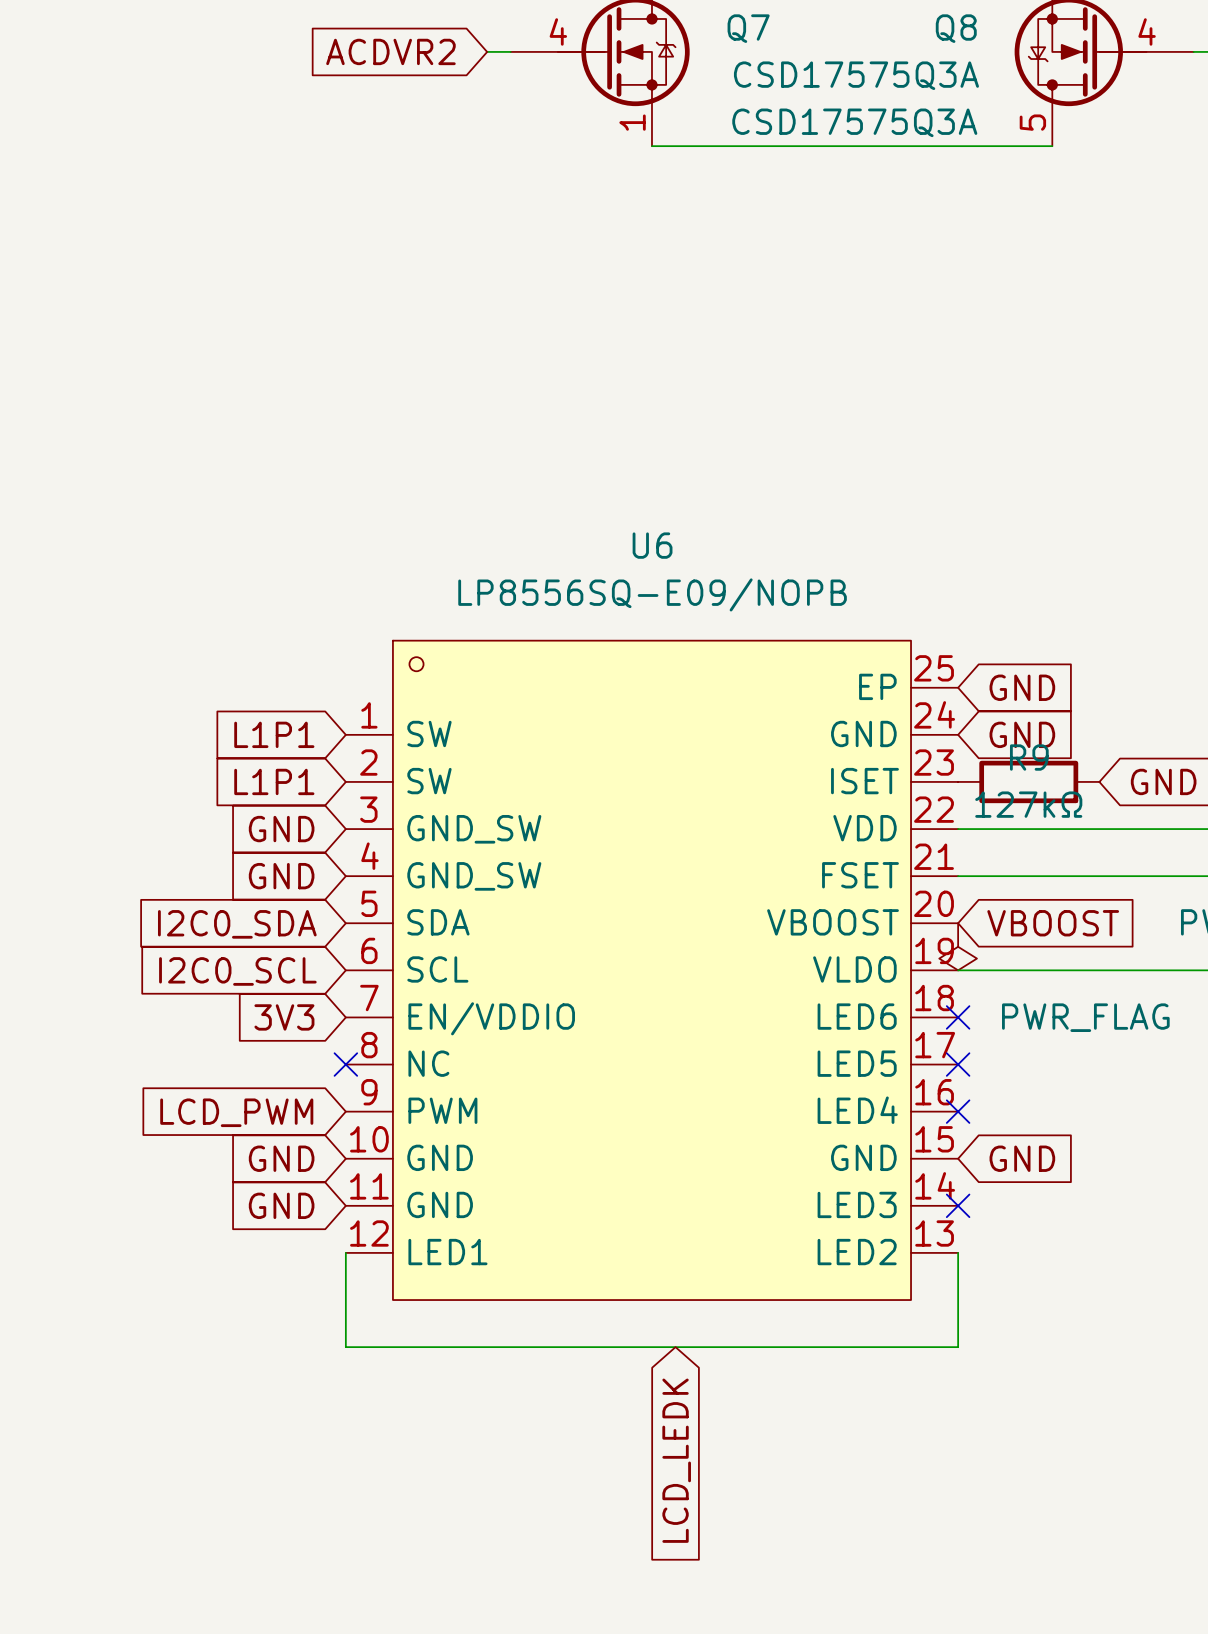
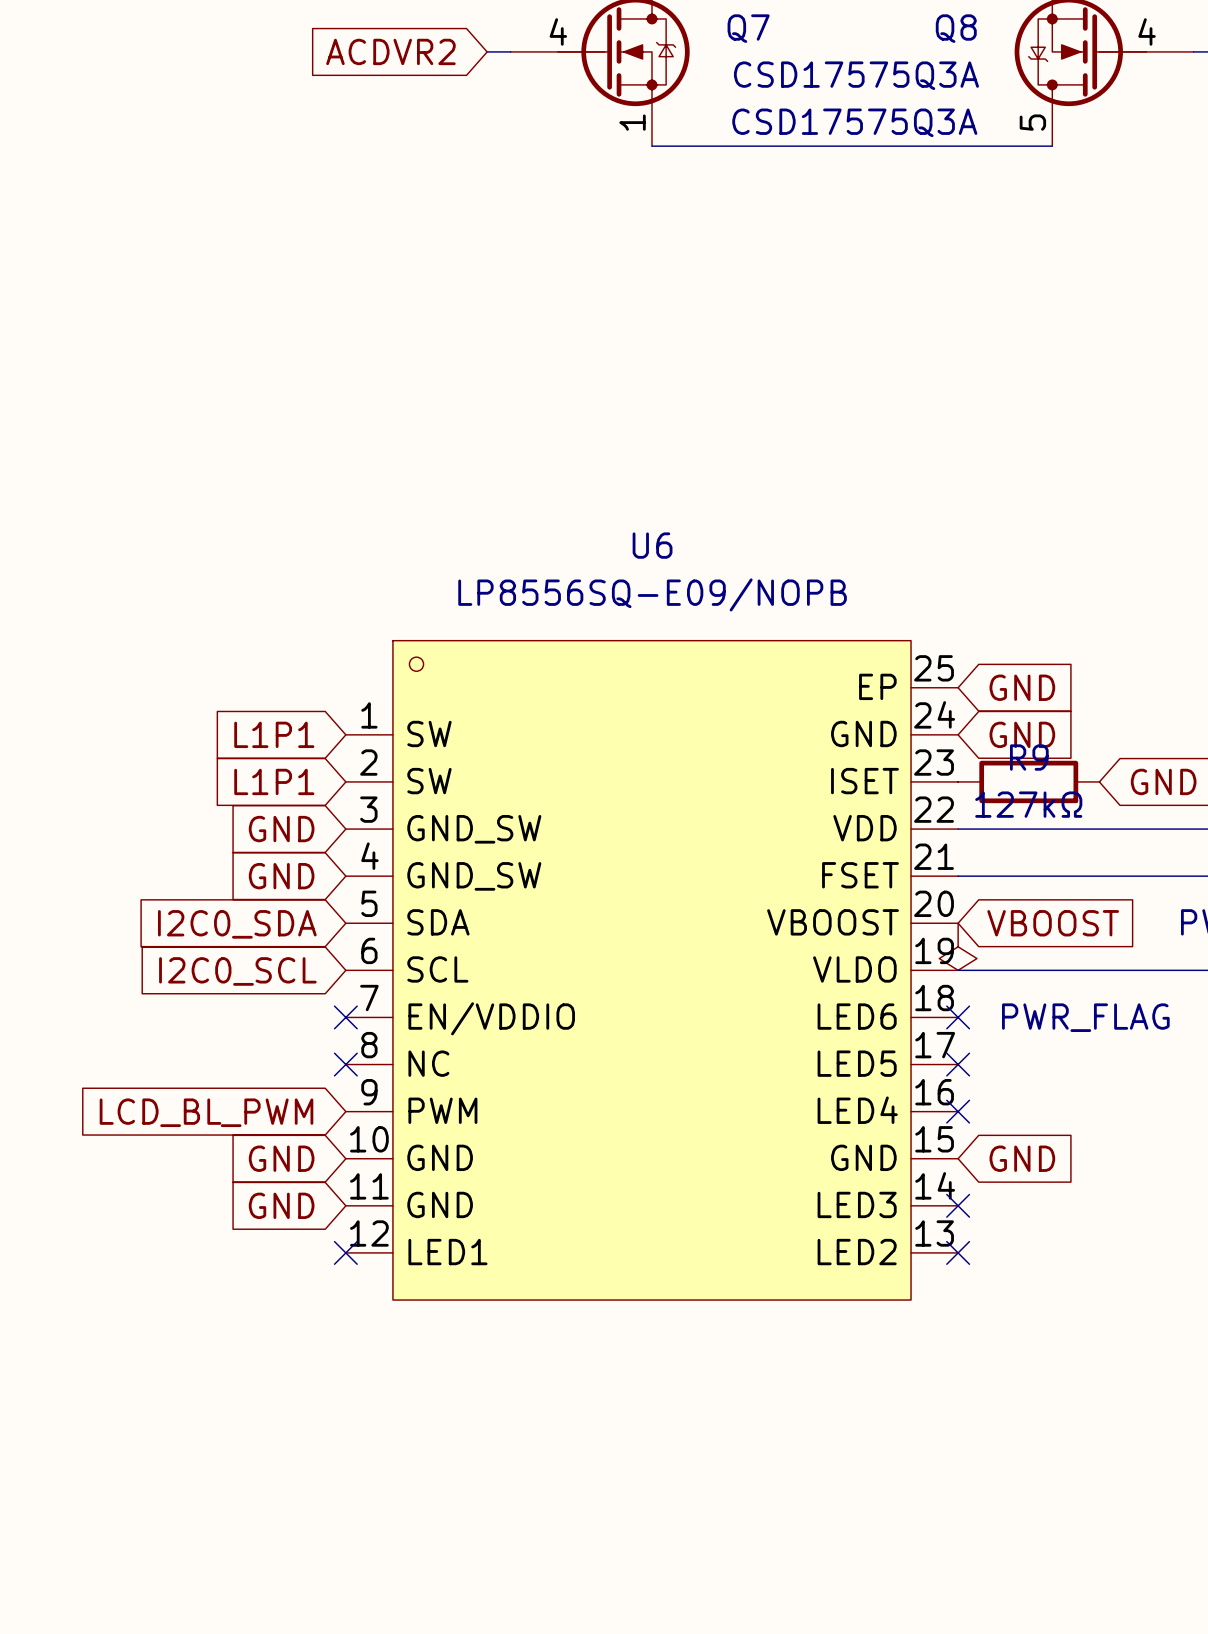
global label: 3V3 (284, 1017) -> none
no-connect mark: none -> (345, 1017)
global label: LCD_PWM (236, 1112) -> LCD_BL_PWM (206, 1112)
wire: (345, 1252) (345, 1347) (958, 1347) (958, 1252) -> none
no-connect mark: none -> (345, 1252)
no-connect mark: none -> (958, 1252)
global label: LCD_LEDK (676, 1460) -> none

